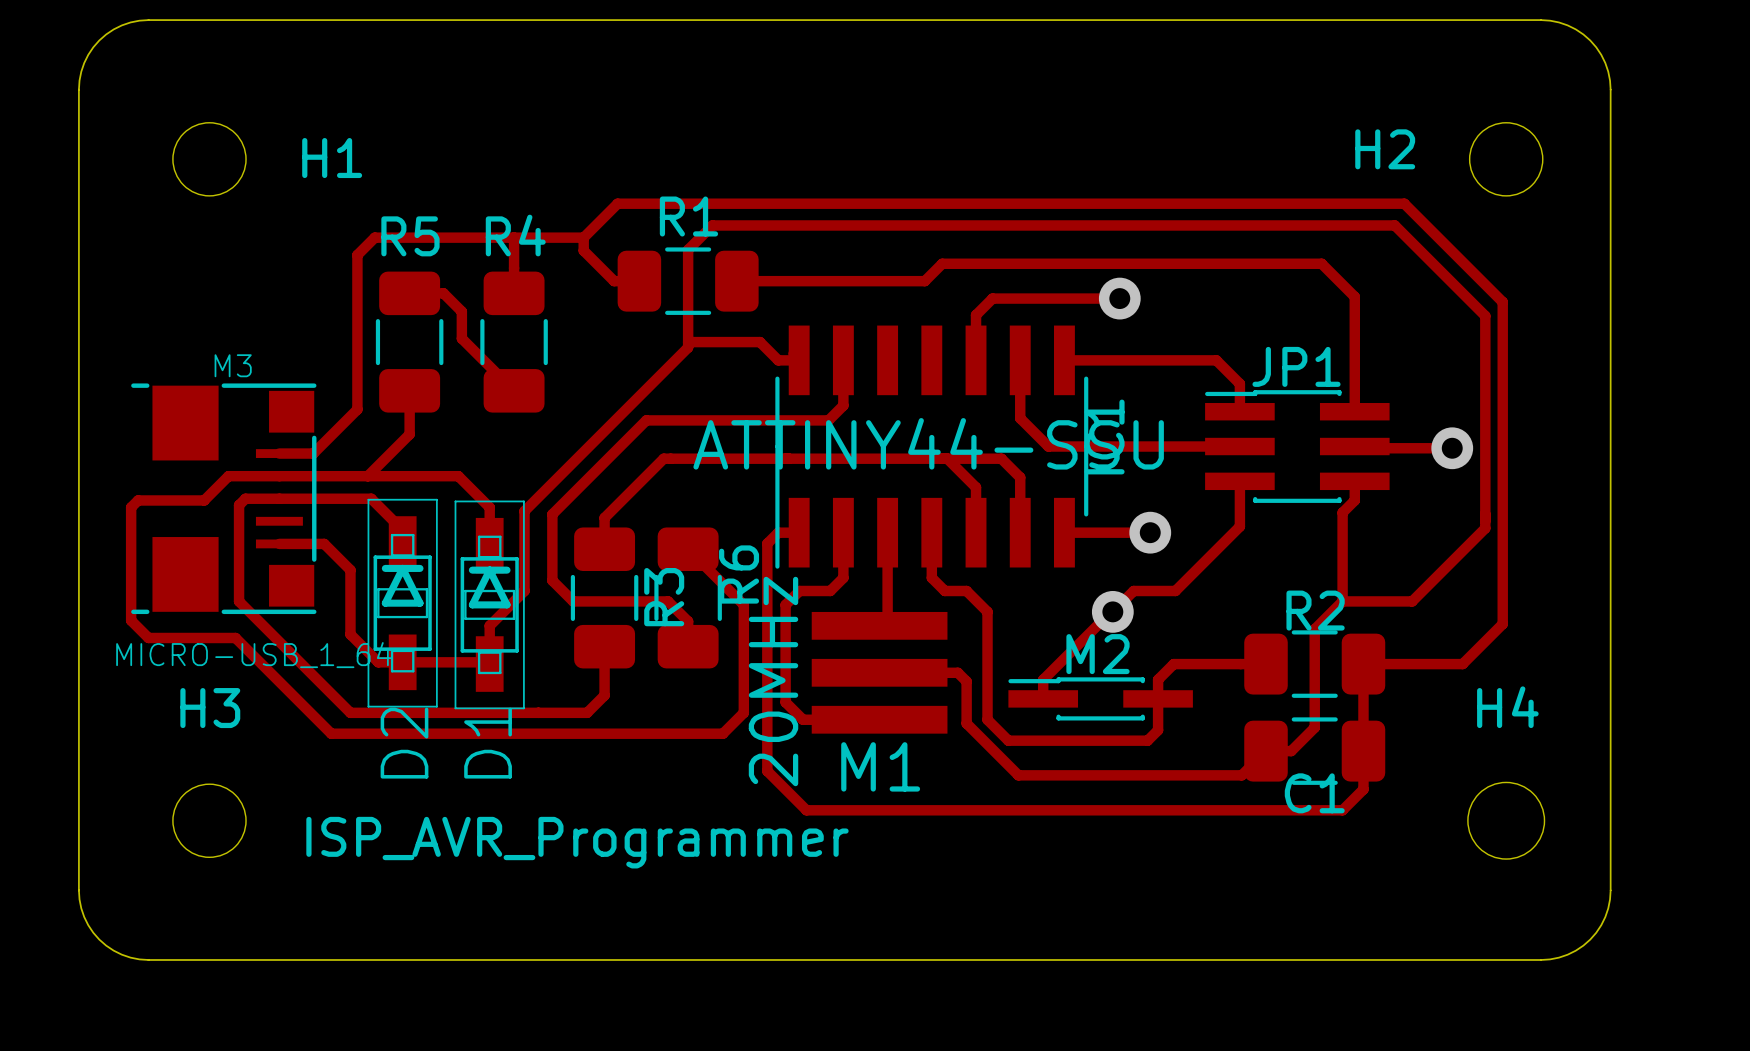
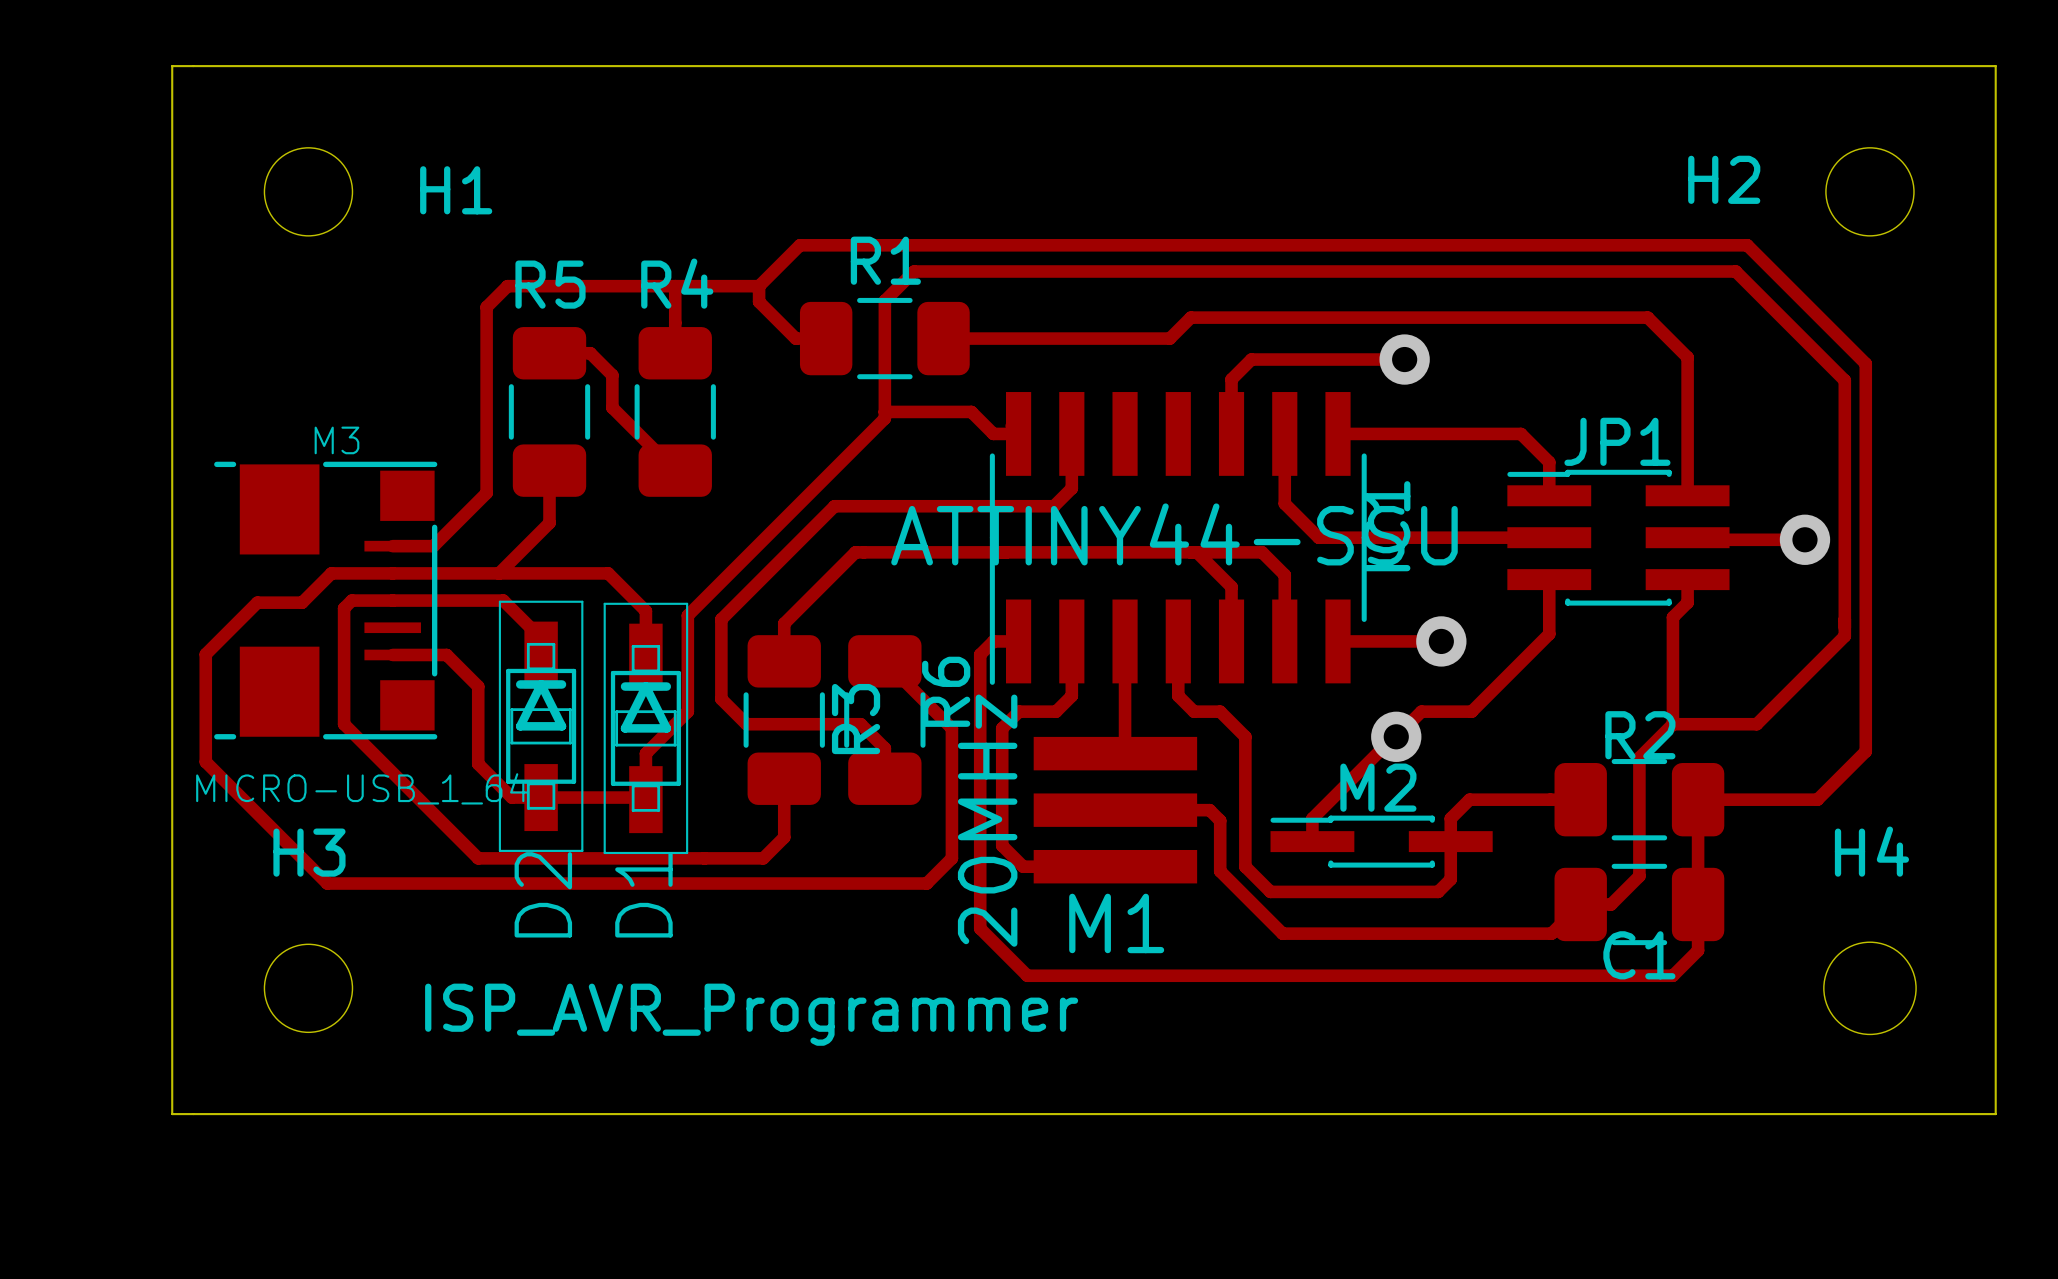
board edge: (1610, 89) (1605, 63) (1590, 40) (1567, 25) (1541, 20) (148, 20) (121, 25) (99, 40) (84, 63) (78, 89) (78, 890) (81, 908) (88, 925) (99, 939) (113, 950) (130, 957) (148, 959) (1541, 959) (1567, 954) (1590, 939) (1605, 917) (1610, 890) -> (1995, 108) (1995, 66) (172, 66) (172, 1114) (1995, 1114) (1995, 1072)
track: (167, 500) (138, 500) (131, 507) (131, 620) (148, 637) (235, 637) (331, 733) -> (257, 602) (205, 654) (205, 761) (327, 883) (455, 883)

